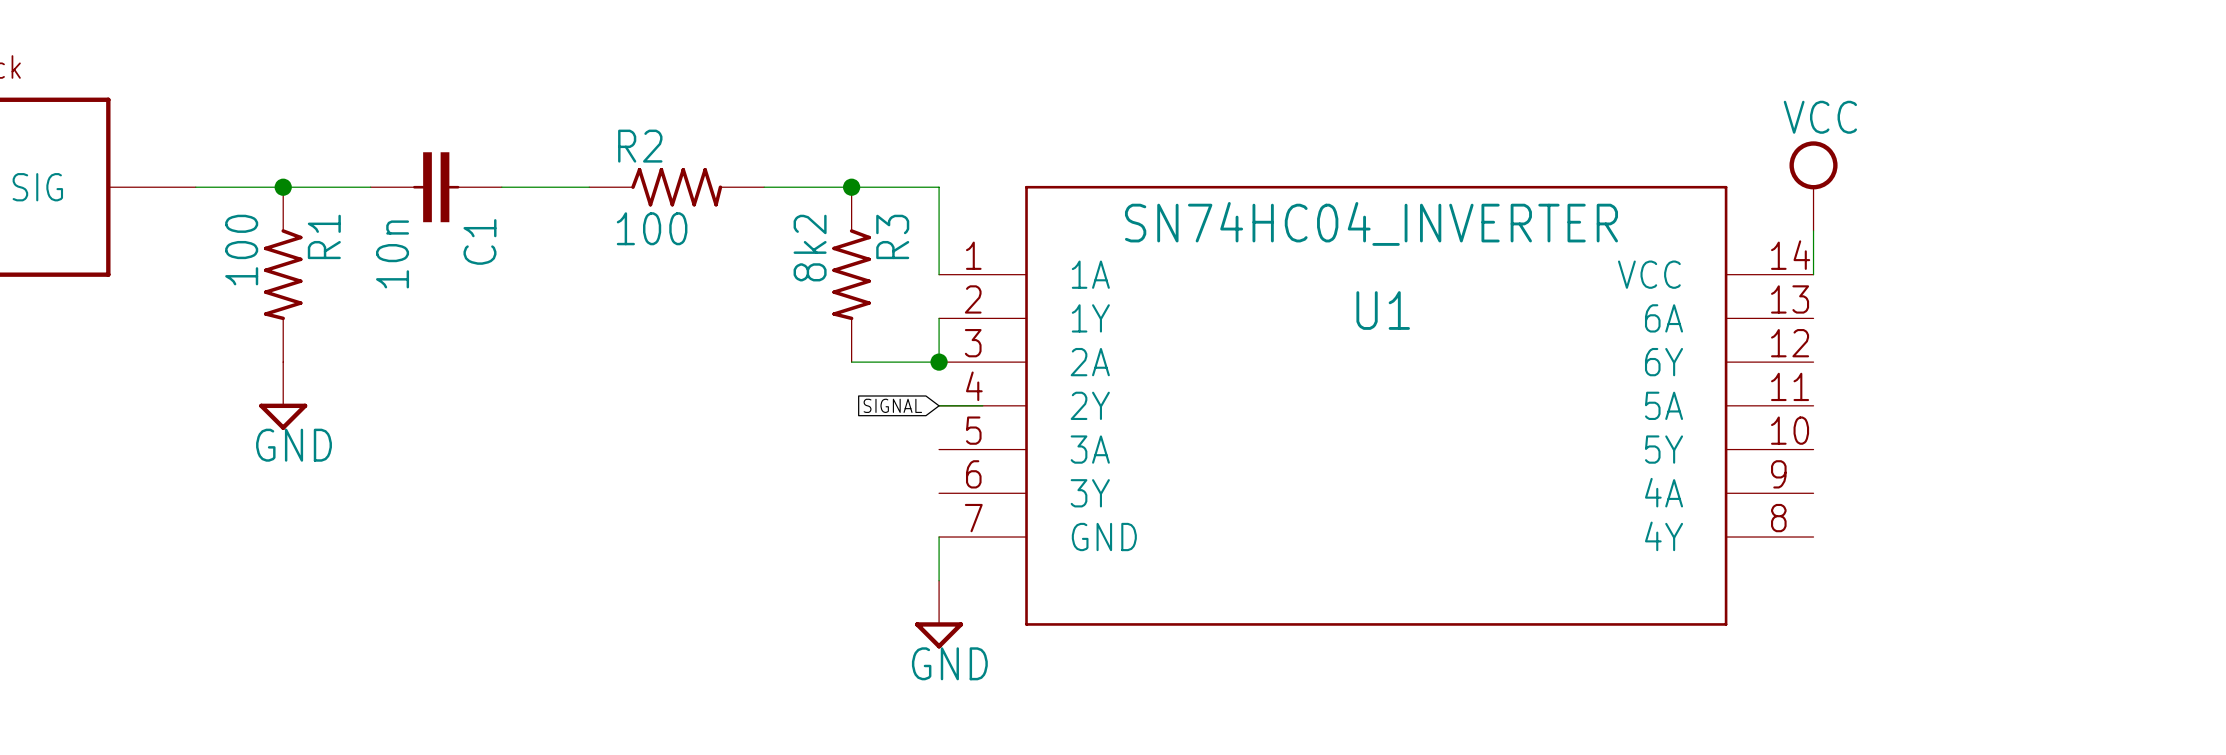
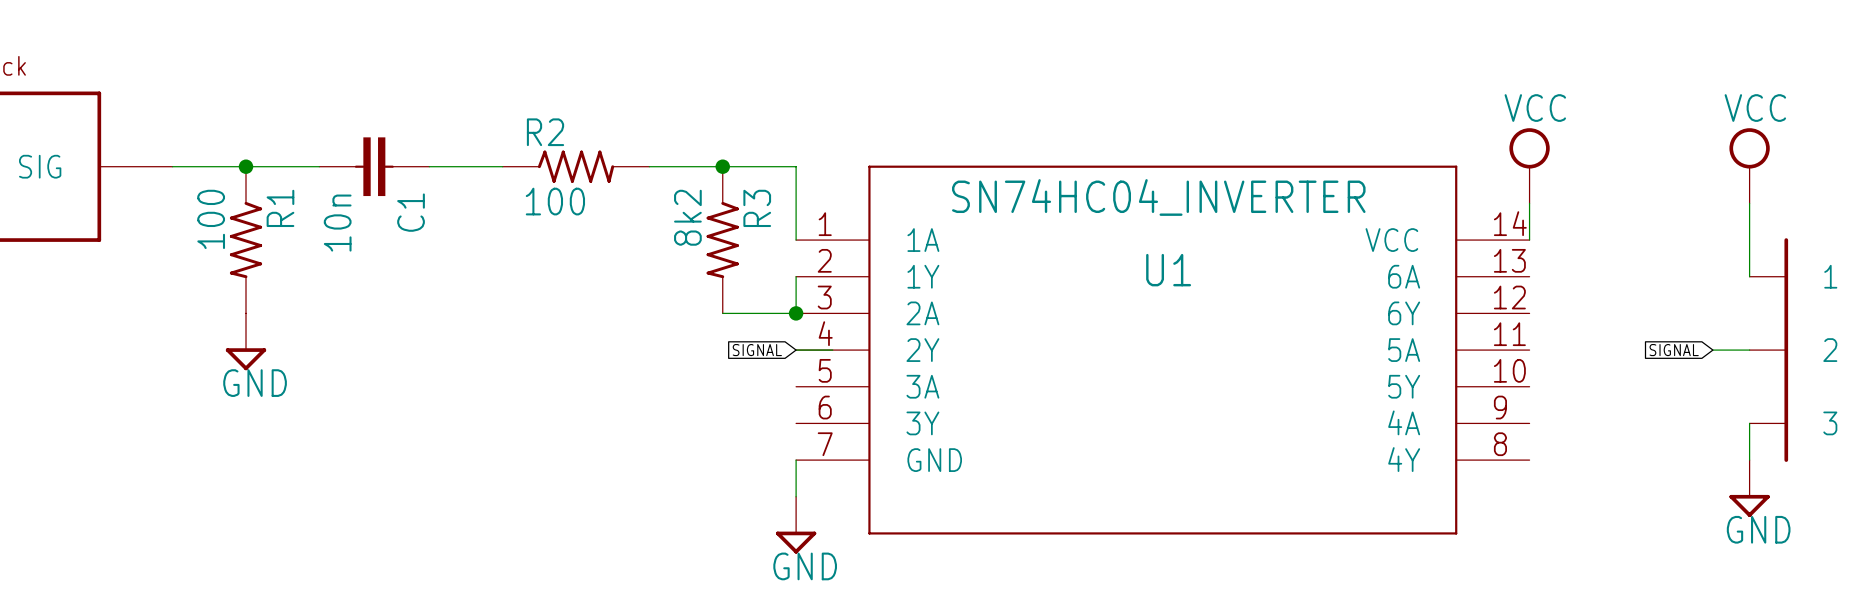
power symbol: none -> VCC (1749, 165)
wire: none -> (1749, 203) (1749, 276)
global label: none -> SIGNAL (1674, 350)
wire: none -> (1712, 350) (1749, 350)
part: none -> (1768, 350)
wire: none -> (1749, 423) (1749, 460)
power symbol: none -> GND (1749, 488)

